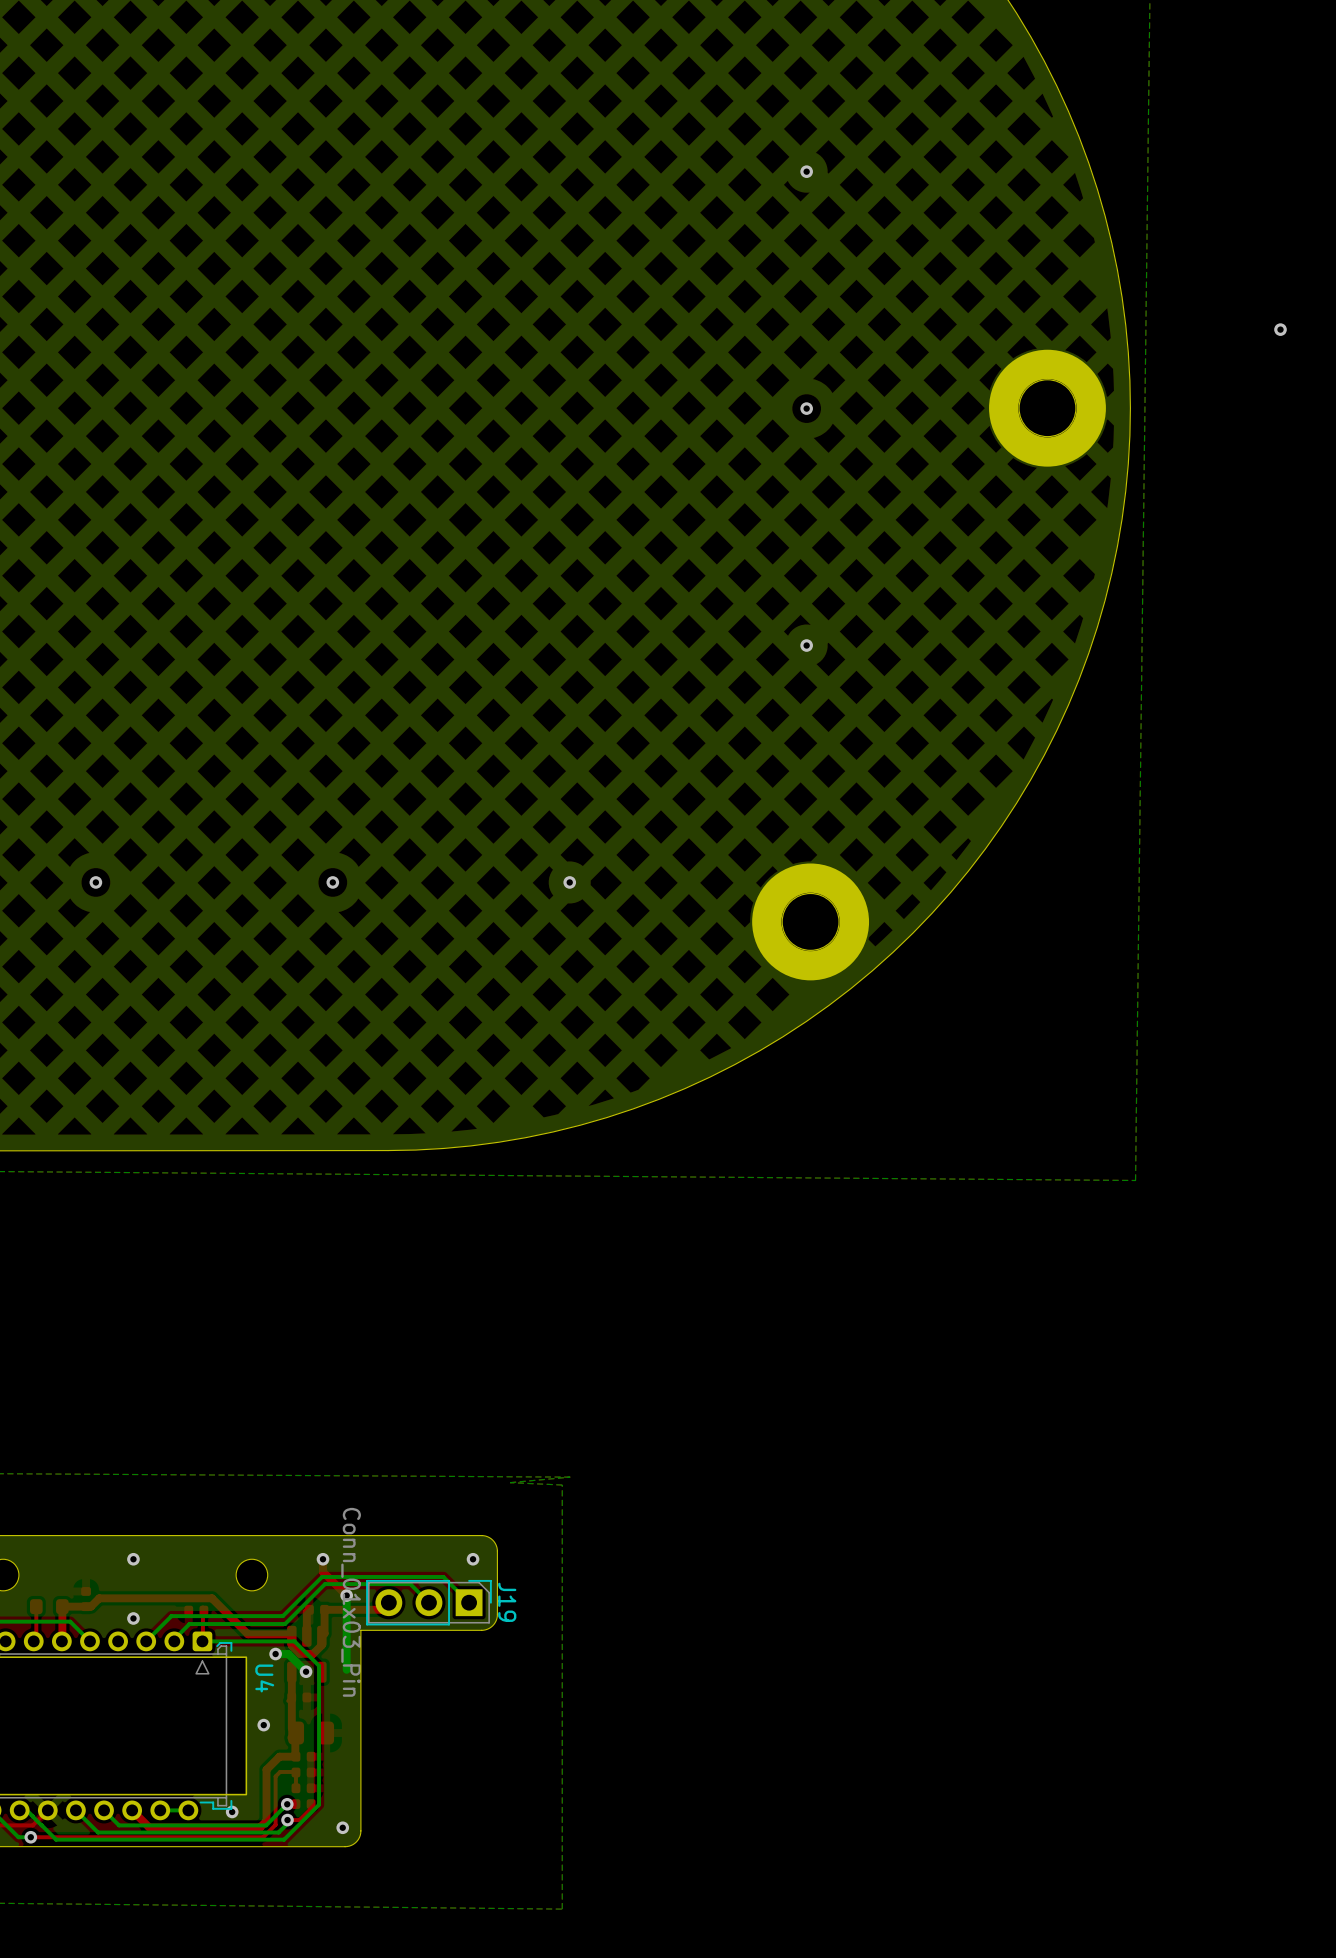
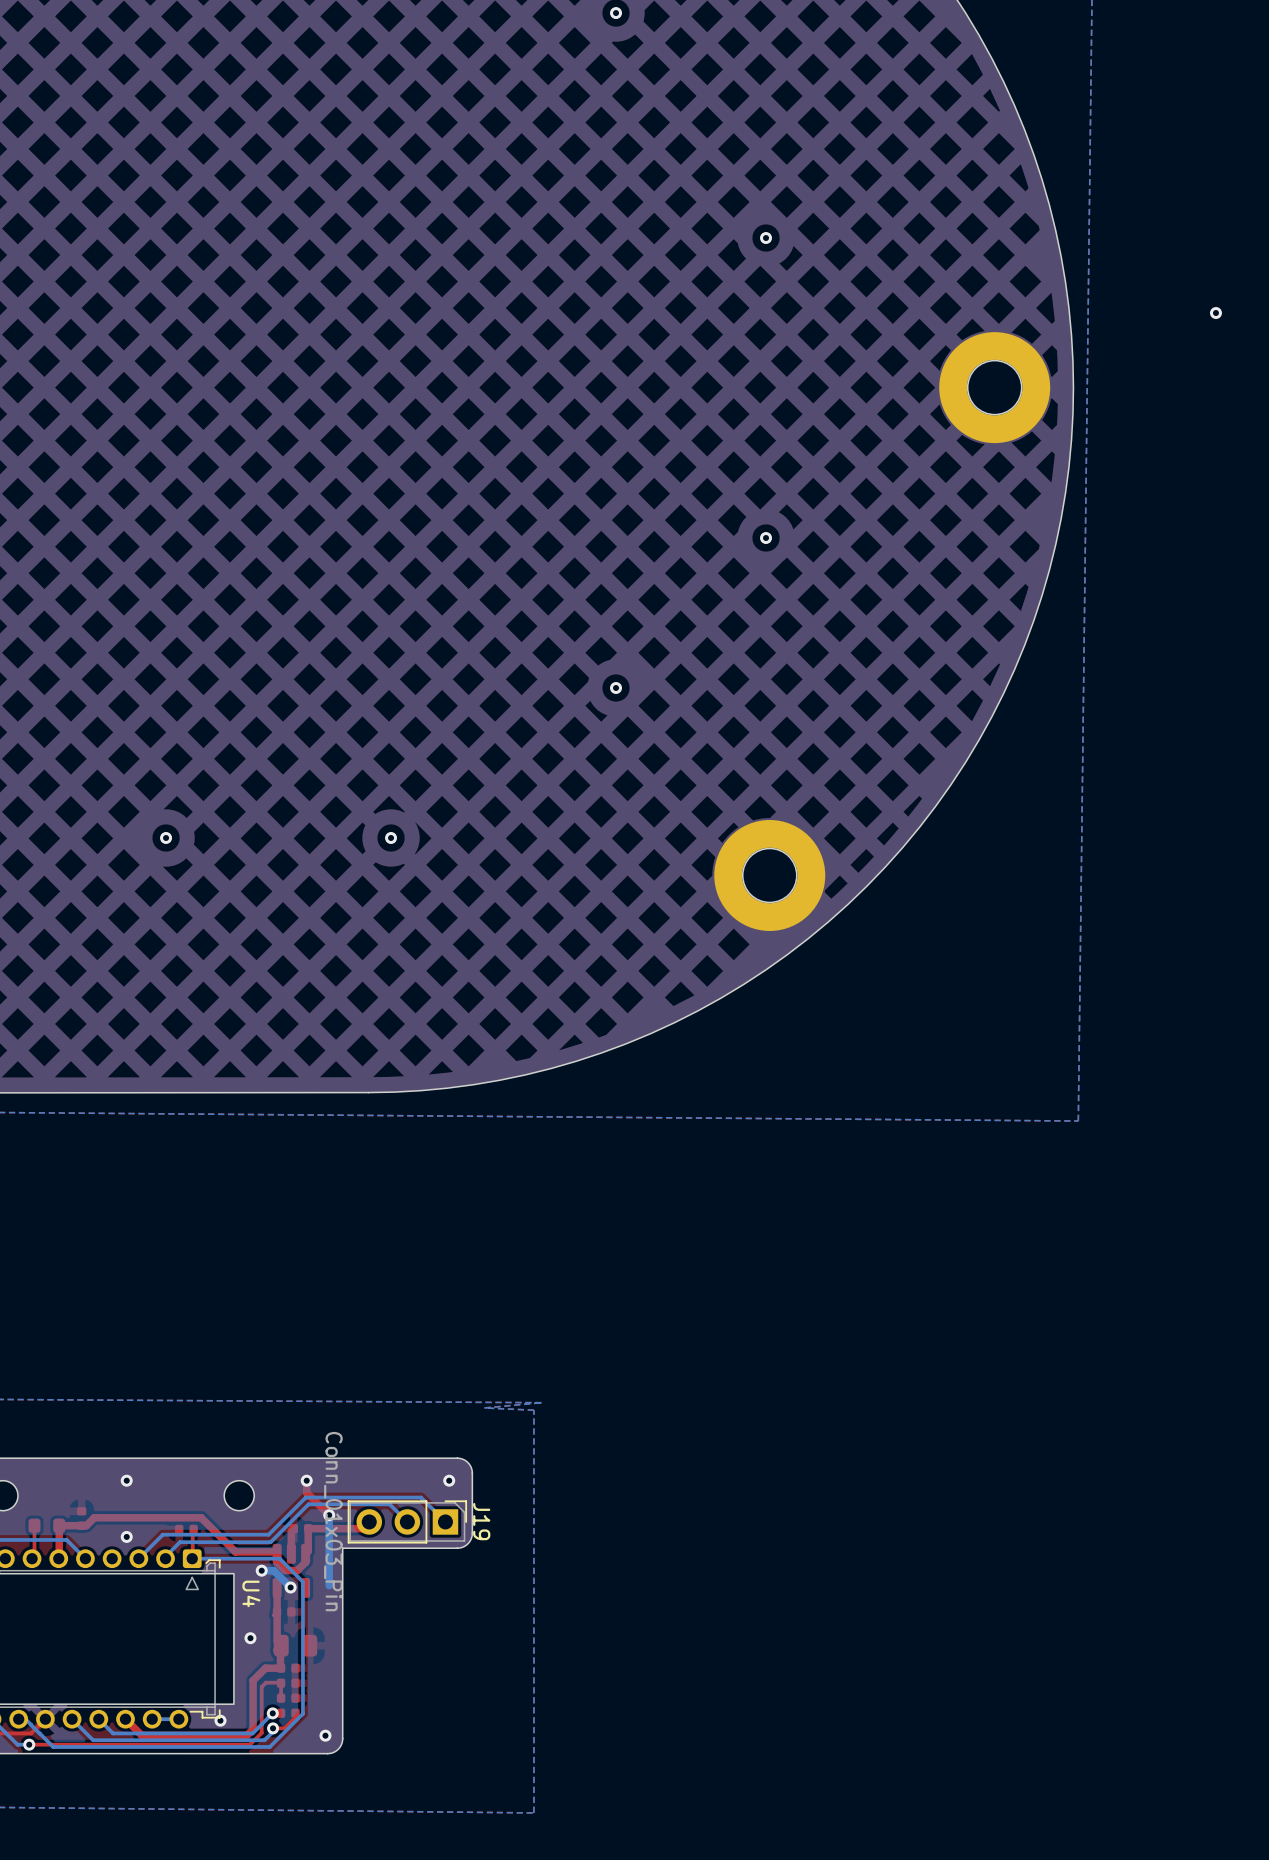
via: none -> (616, 13)
via: (806, 171) -> none
via: none -> (766, 238)
via: (806, 408) -> none
via: none -> (766, 538)
via: (806, 645) -> none
via: none -> (616, 688)
via: (95, 882) -> none
via: none -> (166, 837)
via: (332, 882) -> none
via: none -> (391, 837)
via: (569, 882) -> none

